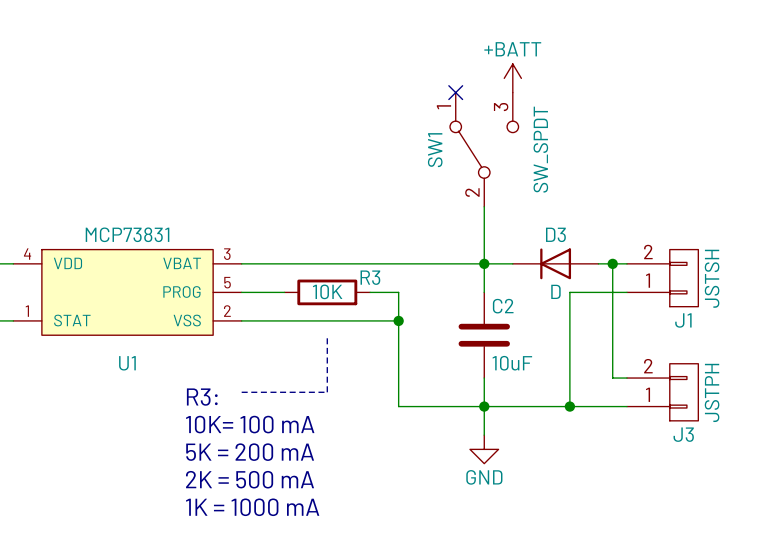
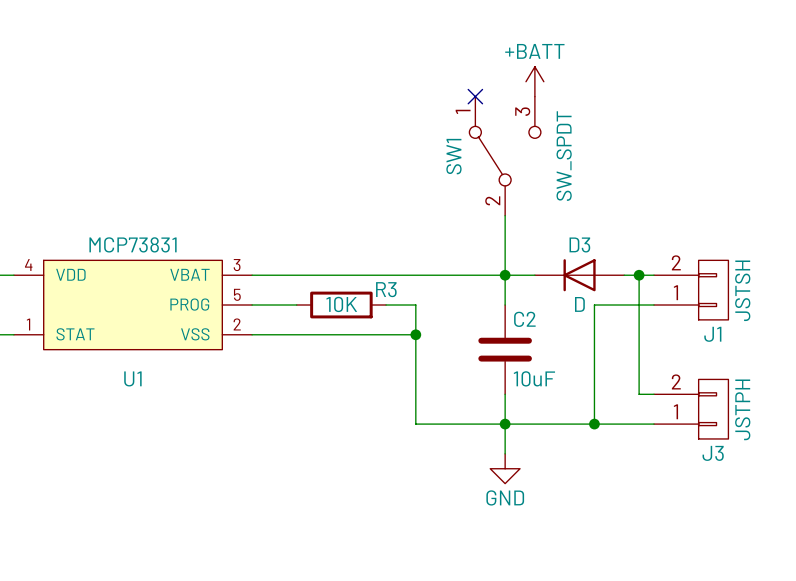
line: (327, 335) (327, 392) (241, 392) -> none
text: R3: (202, 397) -> none
text: 10K= 100 mA (250, 424) -> none
text: 5K = 200 mA (250, 452) -> none
text: 2K = 500 mA (250, 479) -> none
text: 1K = 1000 mA (252, 507) -> none

